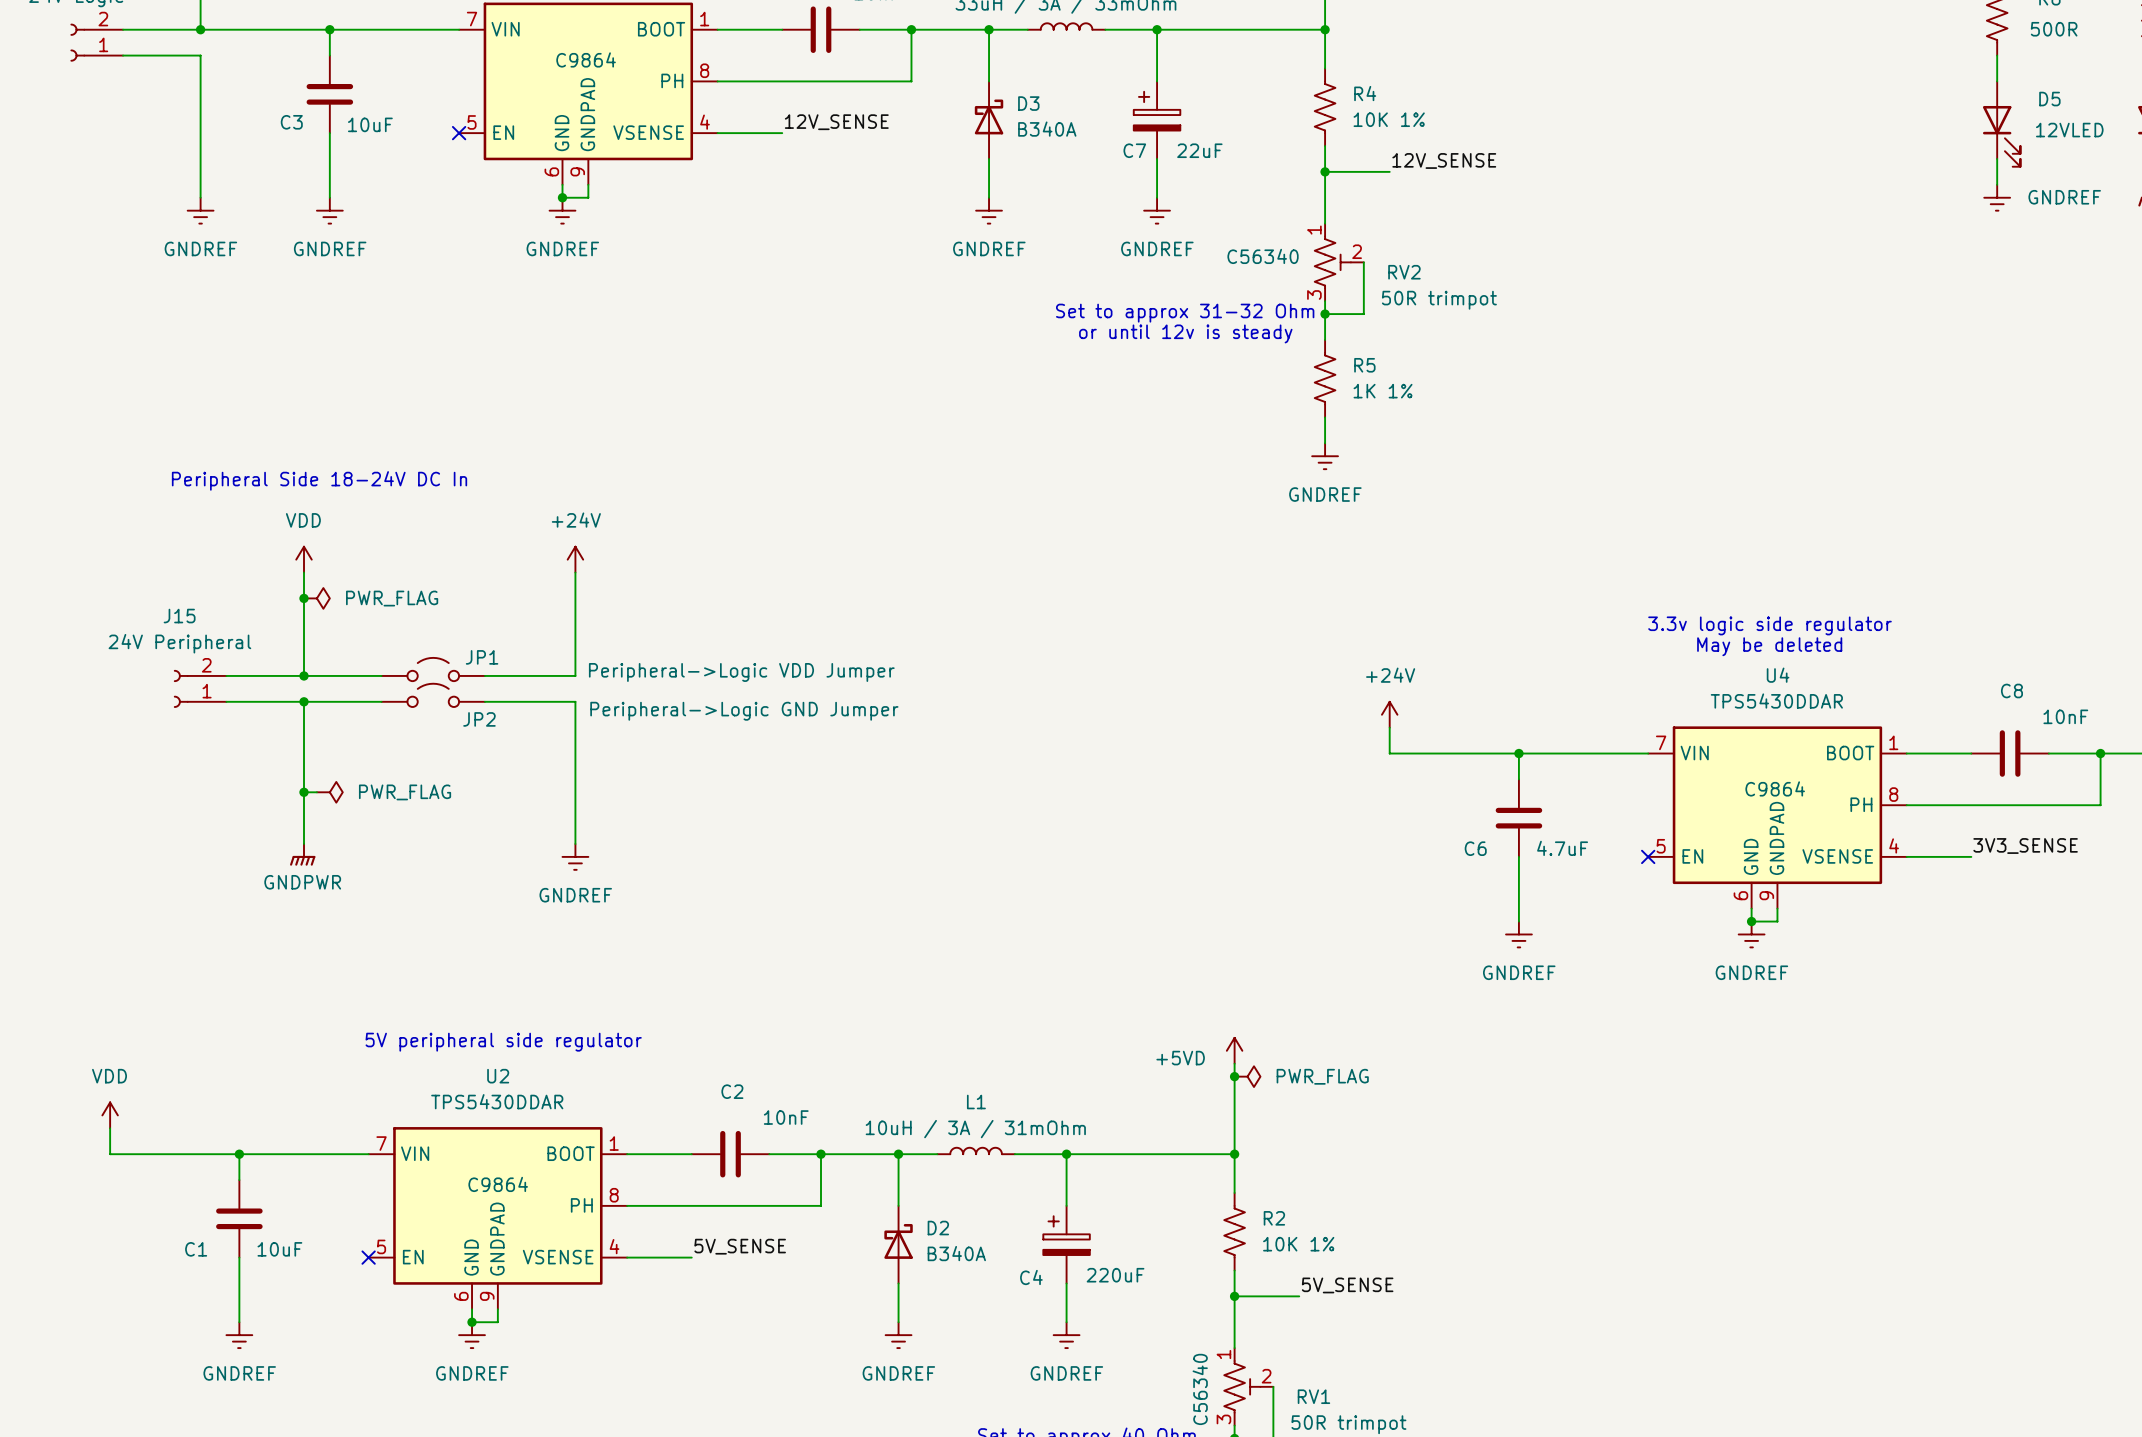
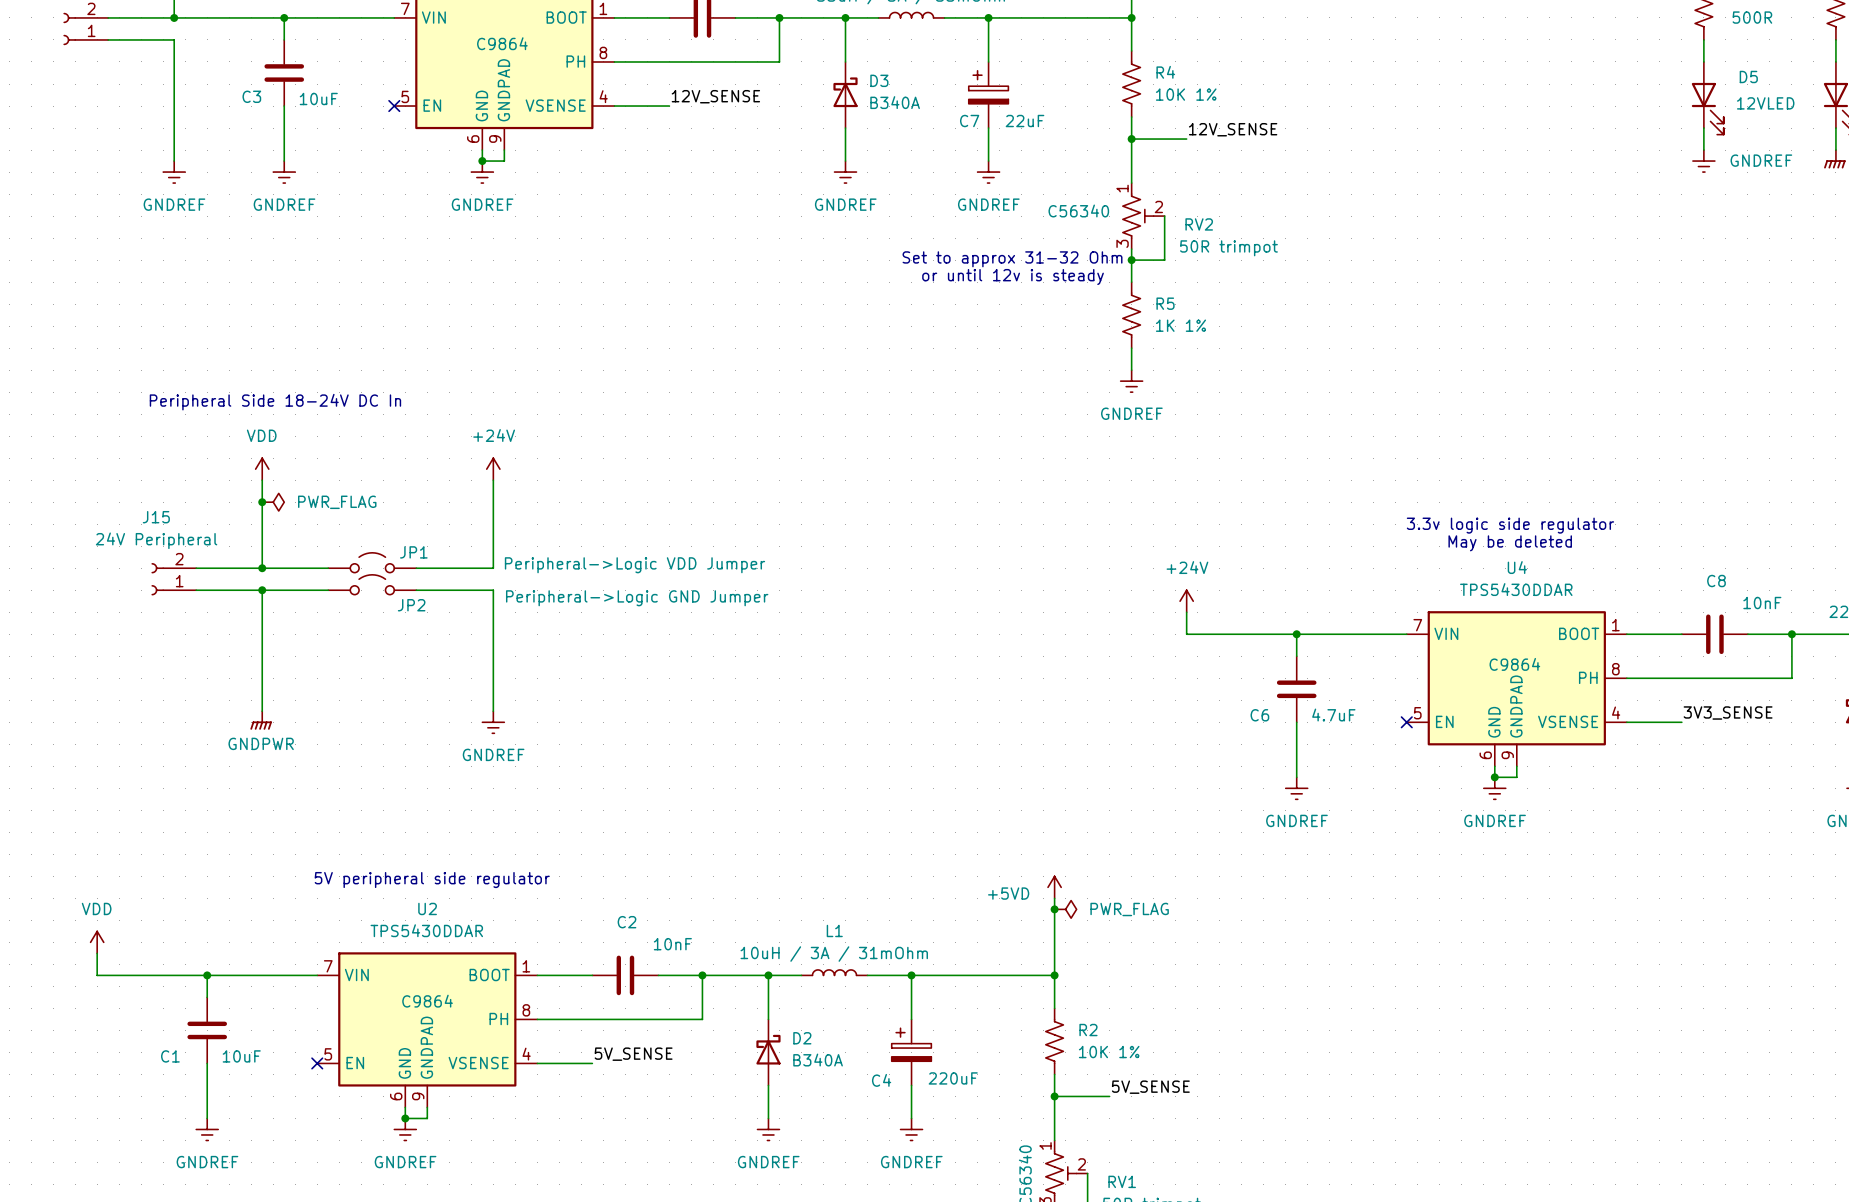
wire: (304, 792) (316, 792) -> none
junction: (304, 792) -> none
power symbol: PWR_FLAG (329, 792) -> none

